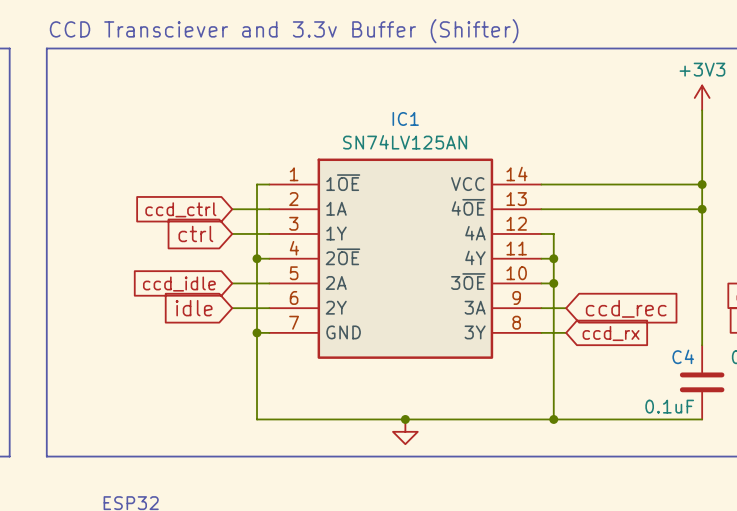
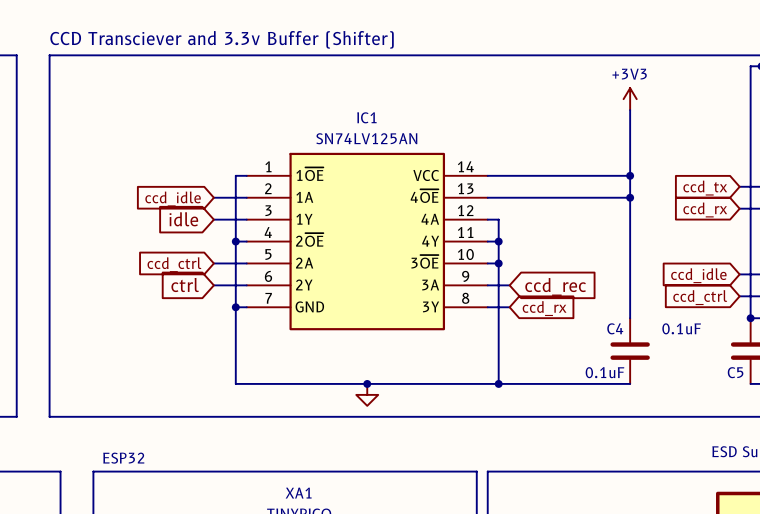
global label: ccd_ctrl (180, 209) -> ccd_idle (173, 199)
global label: ctrl (195, 233) -> idle (183, 219)
global label: ccd_idle (179, 284) -> ccd_ctrl (174, 264)
global label: idle (194, 308) -> ctrl (185, 285)

